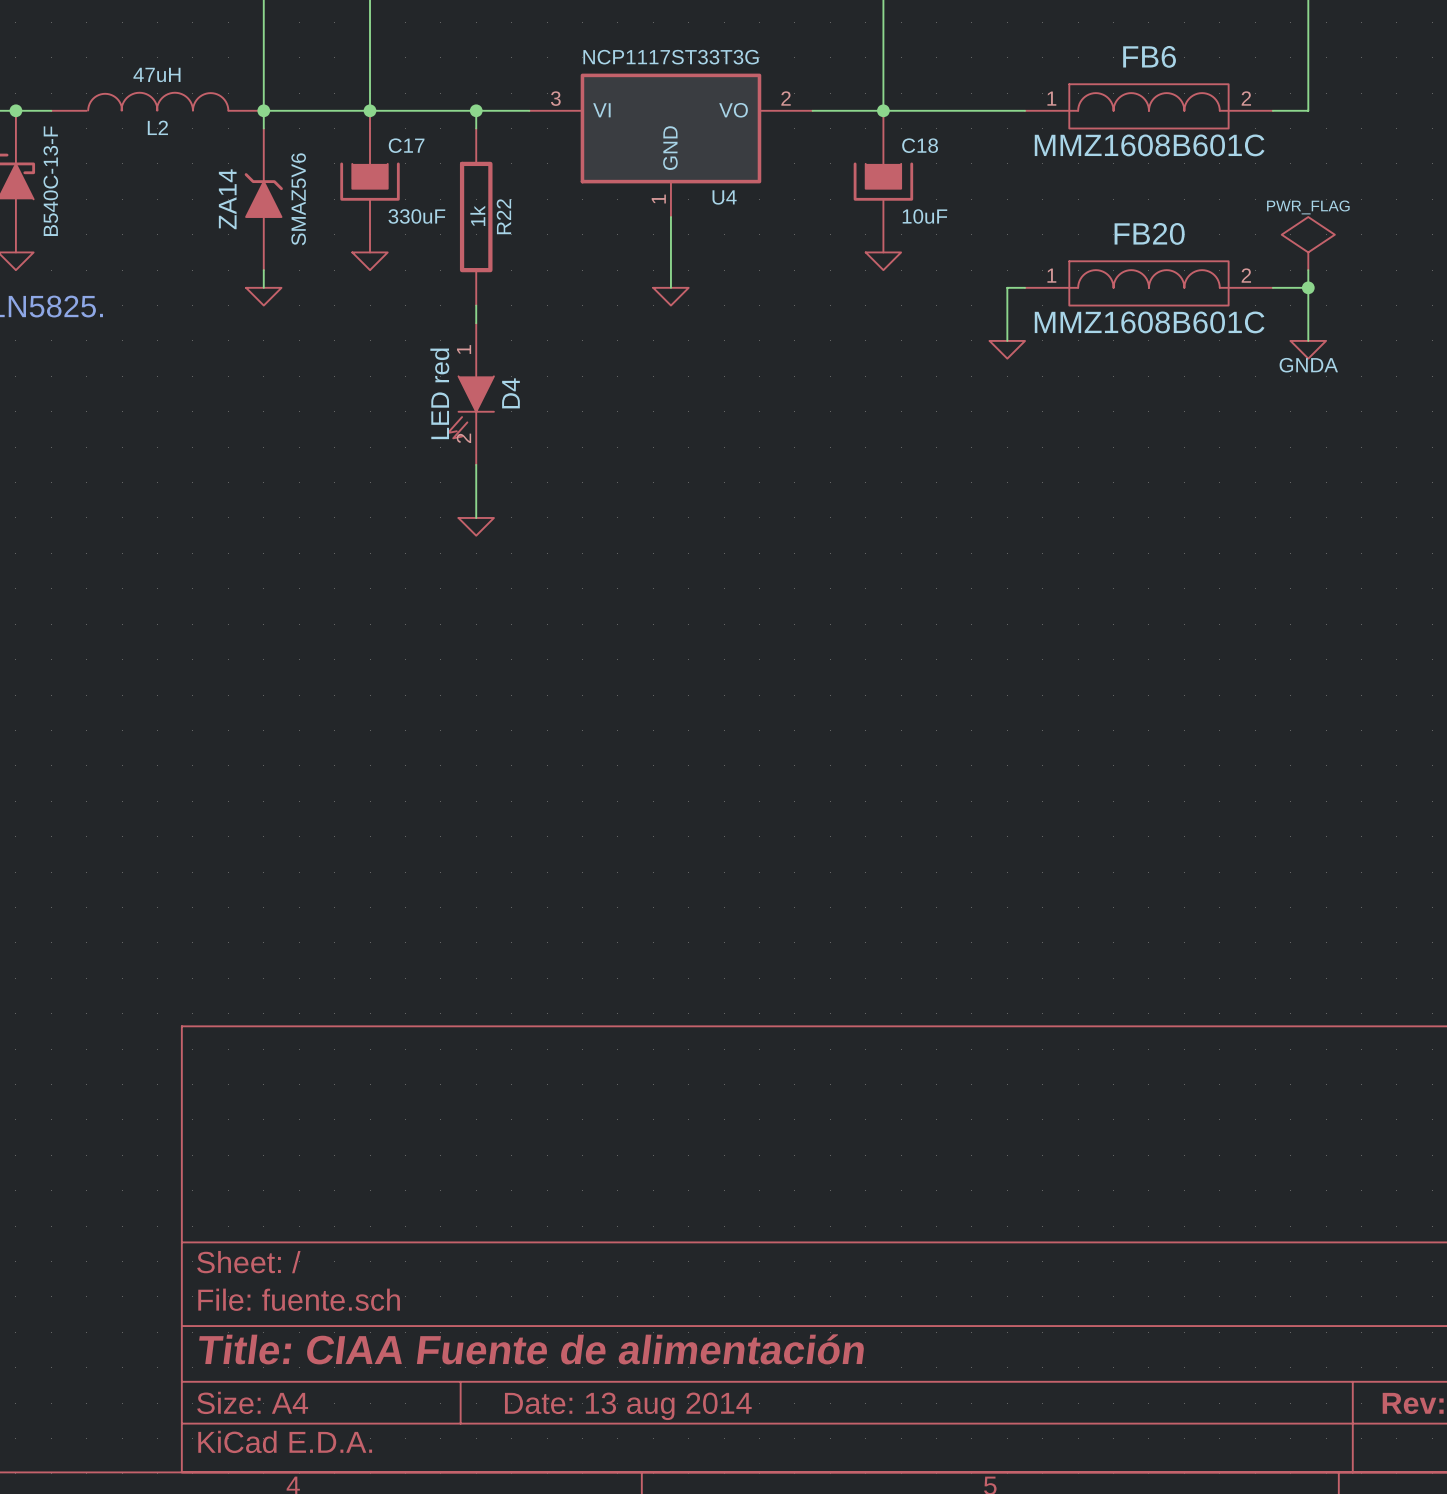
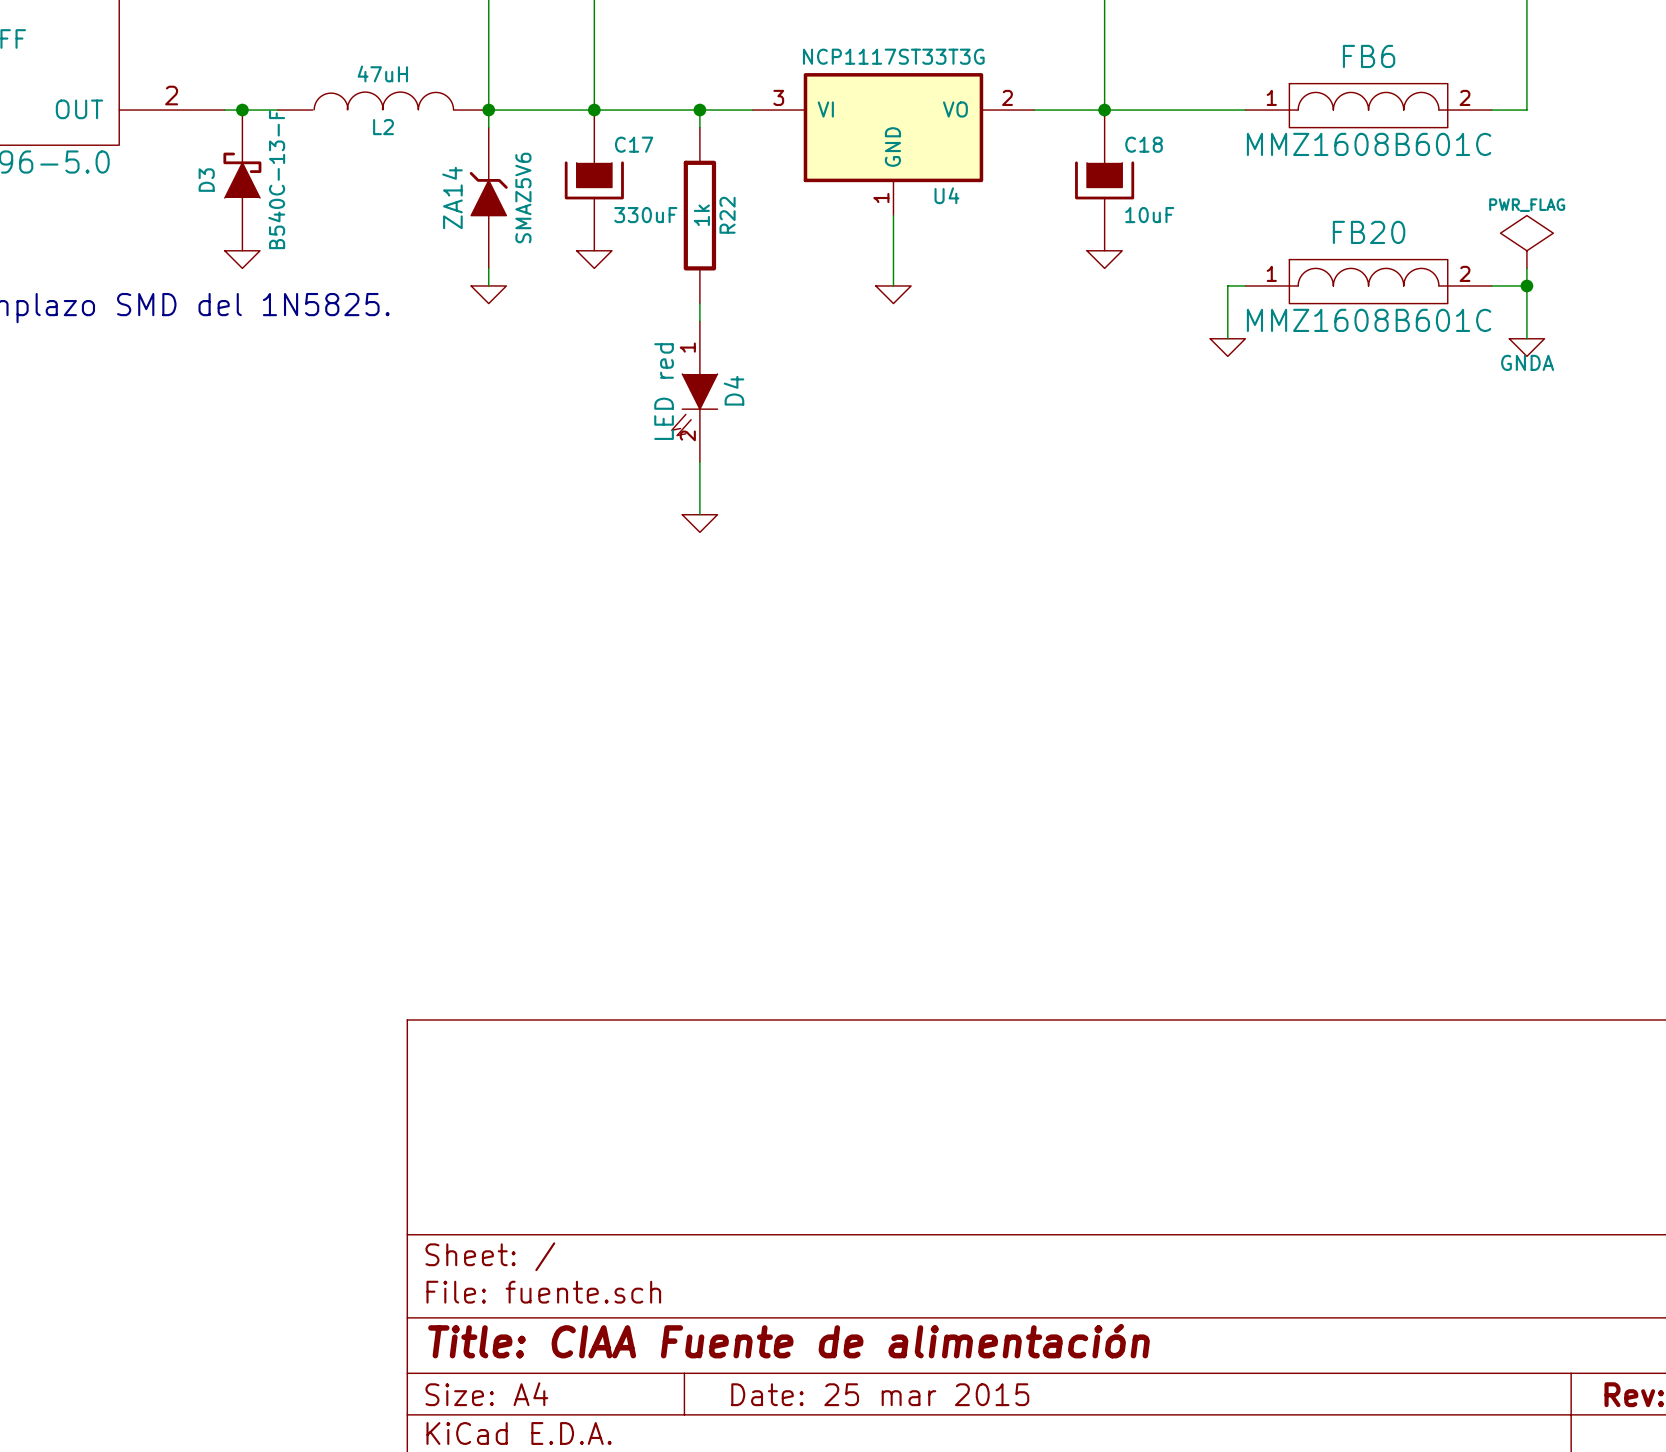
title block: Date: 13 aug 2014 (628, 1406) -> Date: 25 mar 2015 (880, 1394)

